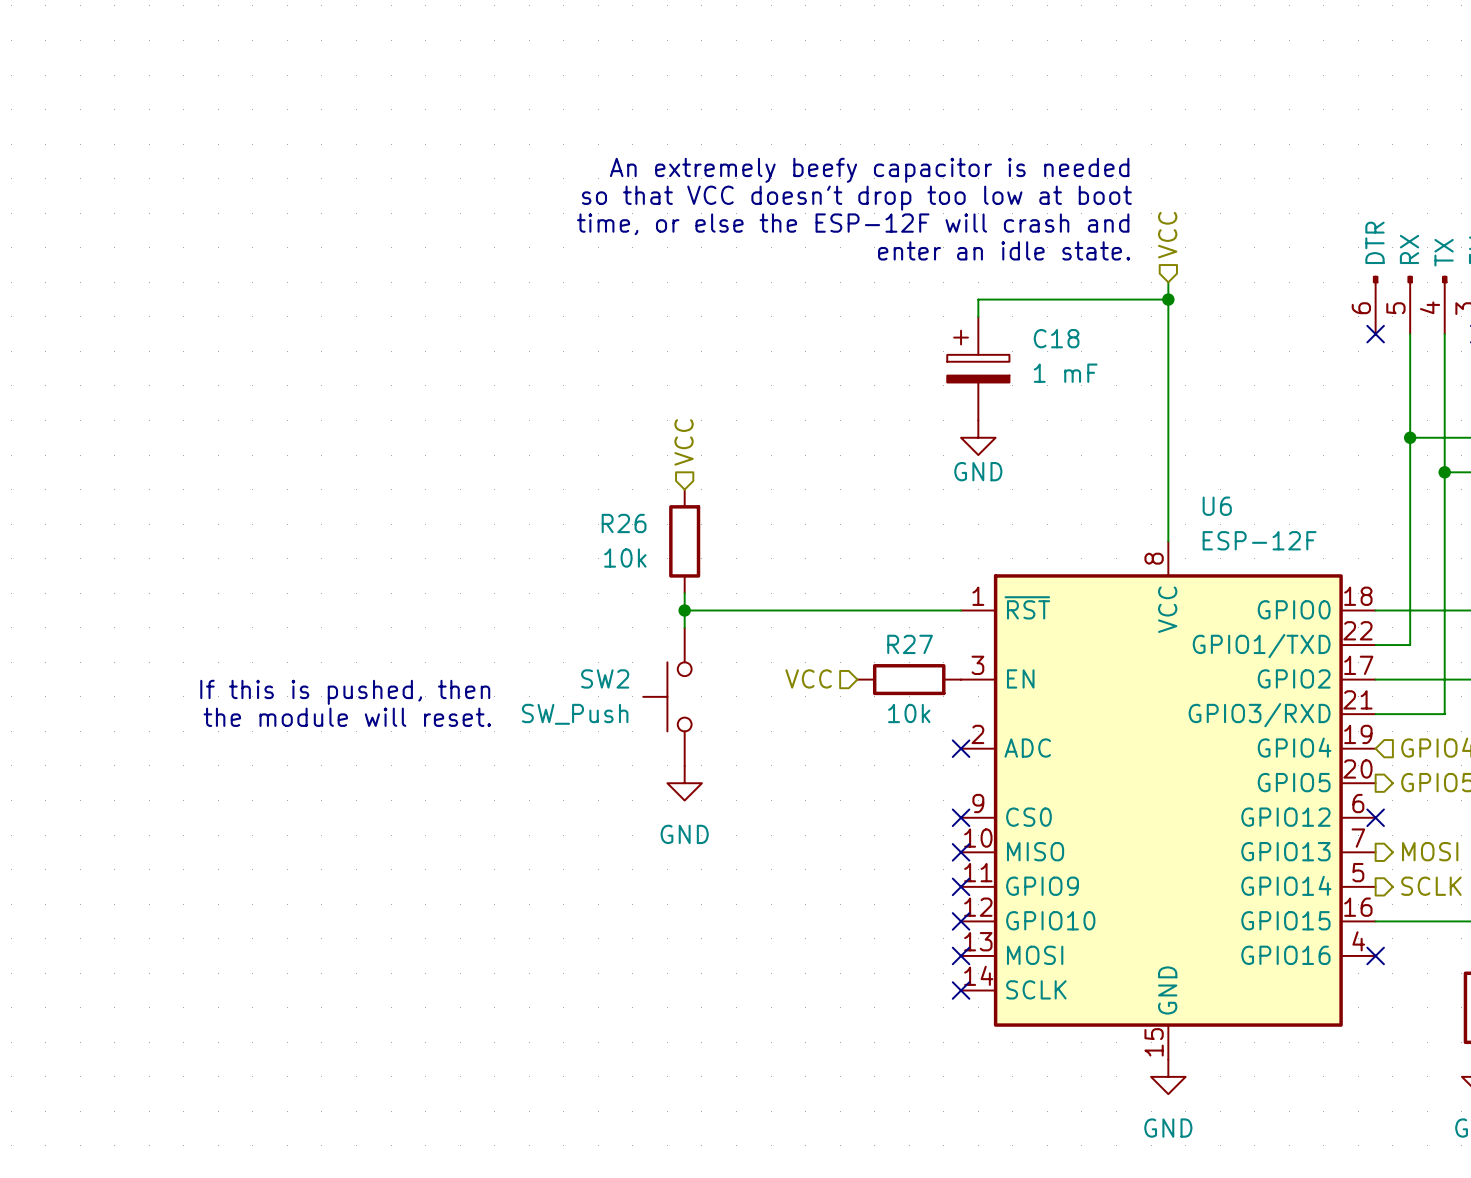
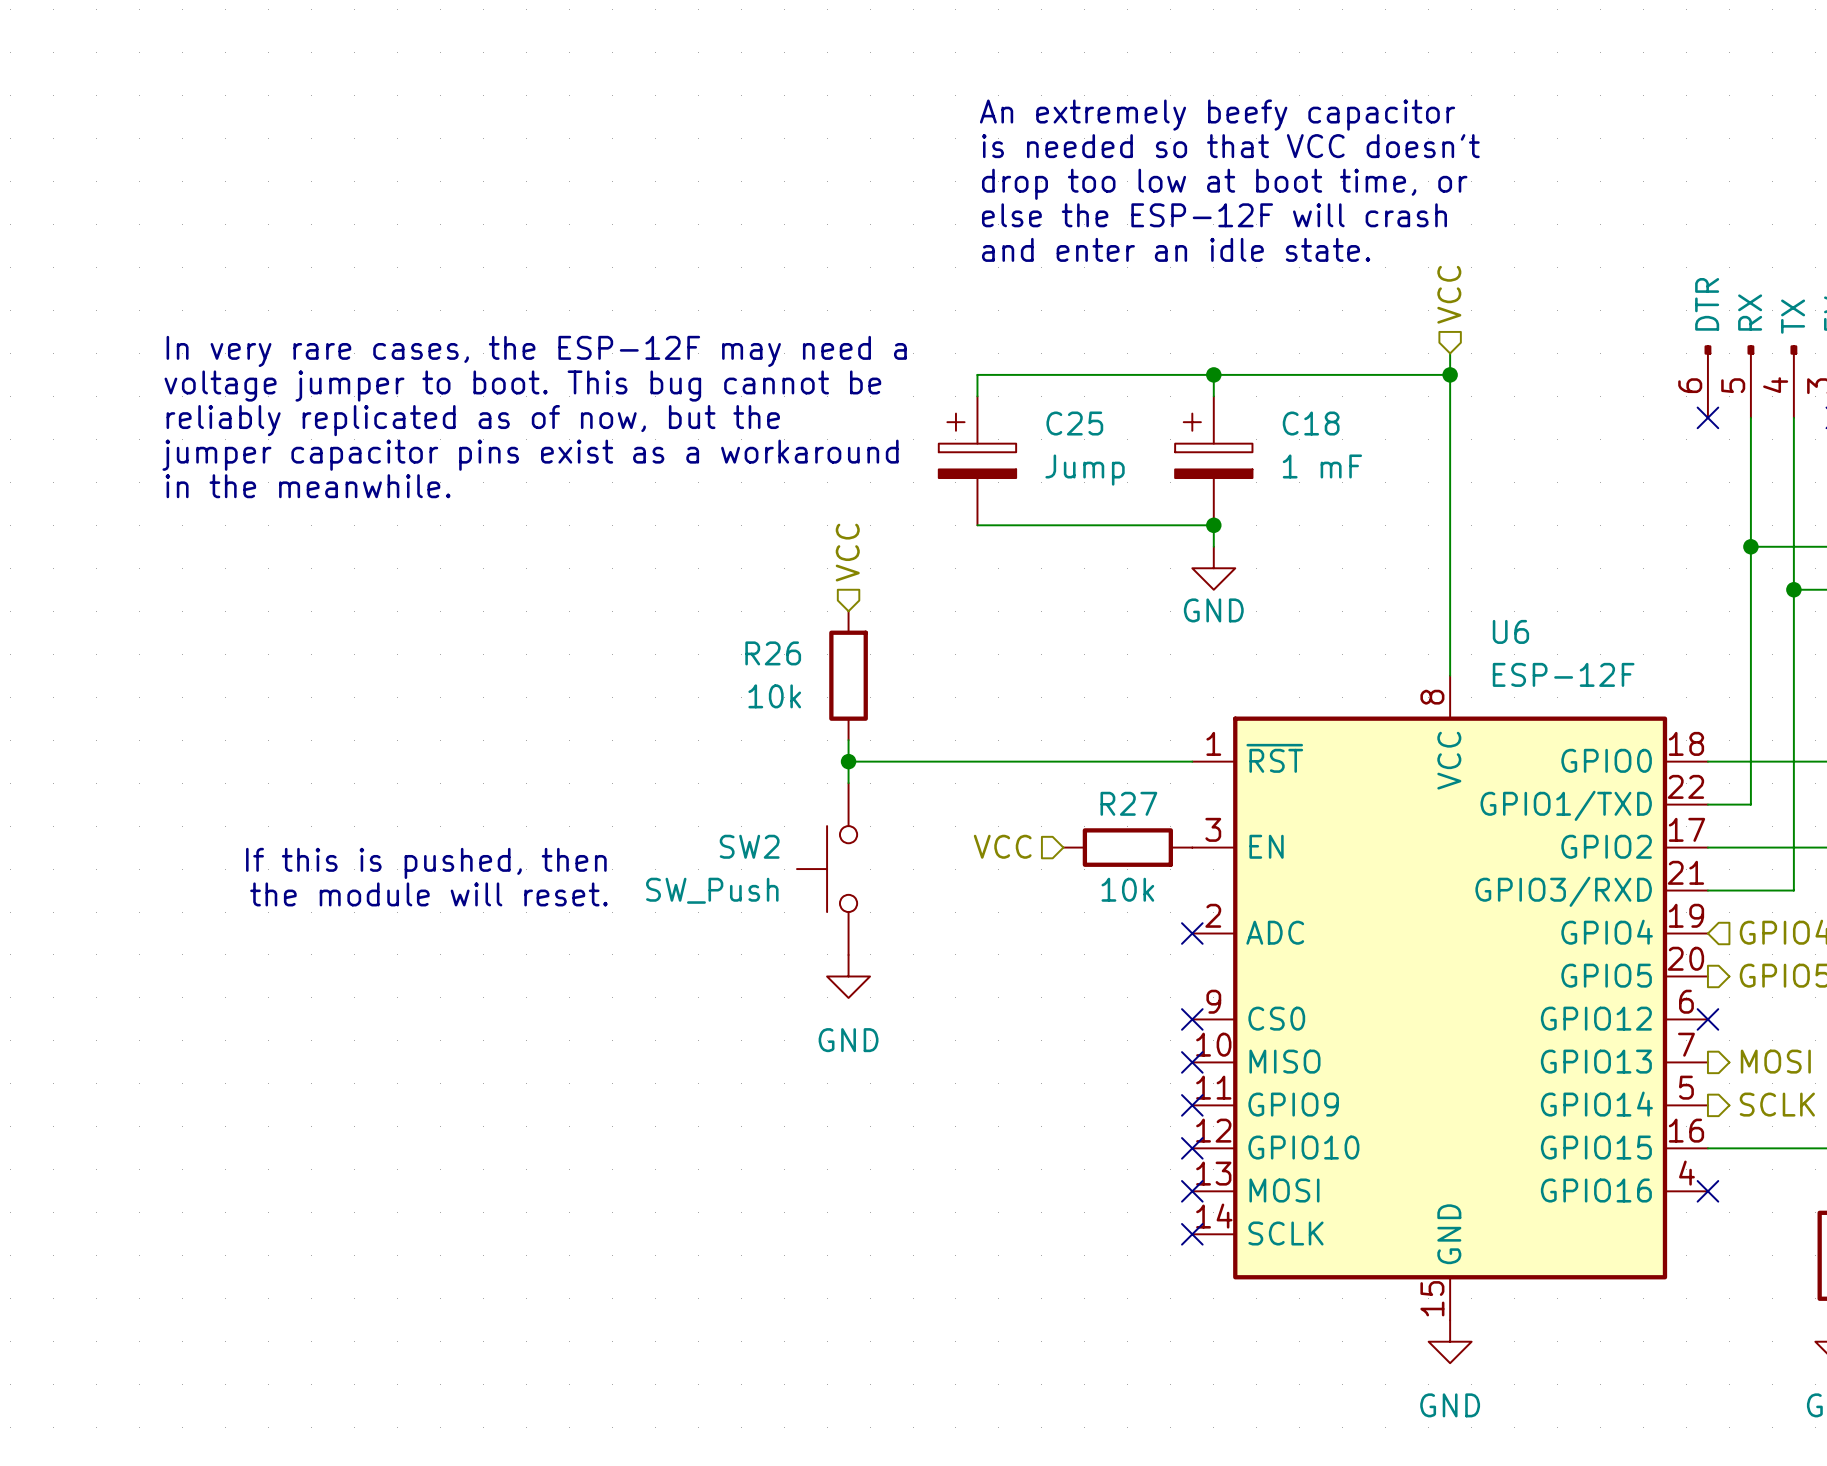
text: none -> An extremely beefy capacitor (1217, 115)
text: none -> is needed so that VCC doesn't (1230, 146)
text: none -> drop too low at boot time, or (1224, 184)
text: An extremely beefy capacitor is needed (869, 170) -> none
text: none -> else the ESP-12F will crash (1214, 215)
text: so that VCC doesn't drop too low at boot (856, 198) -> none
text: none -> and enter an idle state. (1176, 249)
text: time, or else the ESP-12F will crash and (853, 224) -> none
text: enter an idle state. (1004, 250) -> none
text: none -> In very rare cases, the ESP-12F may need a (536, 351)
wire: none -> (1213, 374) (977, 374) (977, 396)
junction: none -> (1213, 374)
text: none -> voltage jumper to boot. This bug cannot be (522, 386)
text: none -> reliably replicated as of now, but the (473, 420)
text: none -> jumper capacitor pins exist as a workaround (530, 455)
C25: none -> Jump (977, 460)
text: none -> in the meanwhile. (308, 486)
wire: none -> (977, 525) (1213, 525) (1213, 546)
junction: none -> (1213, 525)
power symbol position: GND (978, 437) -> GND (1213, 568)

